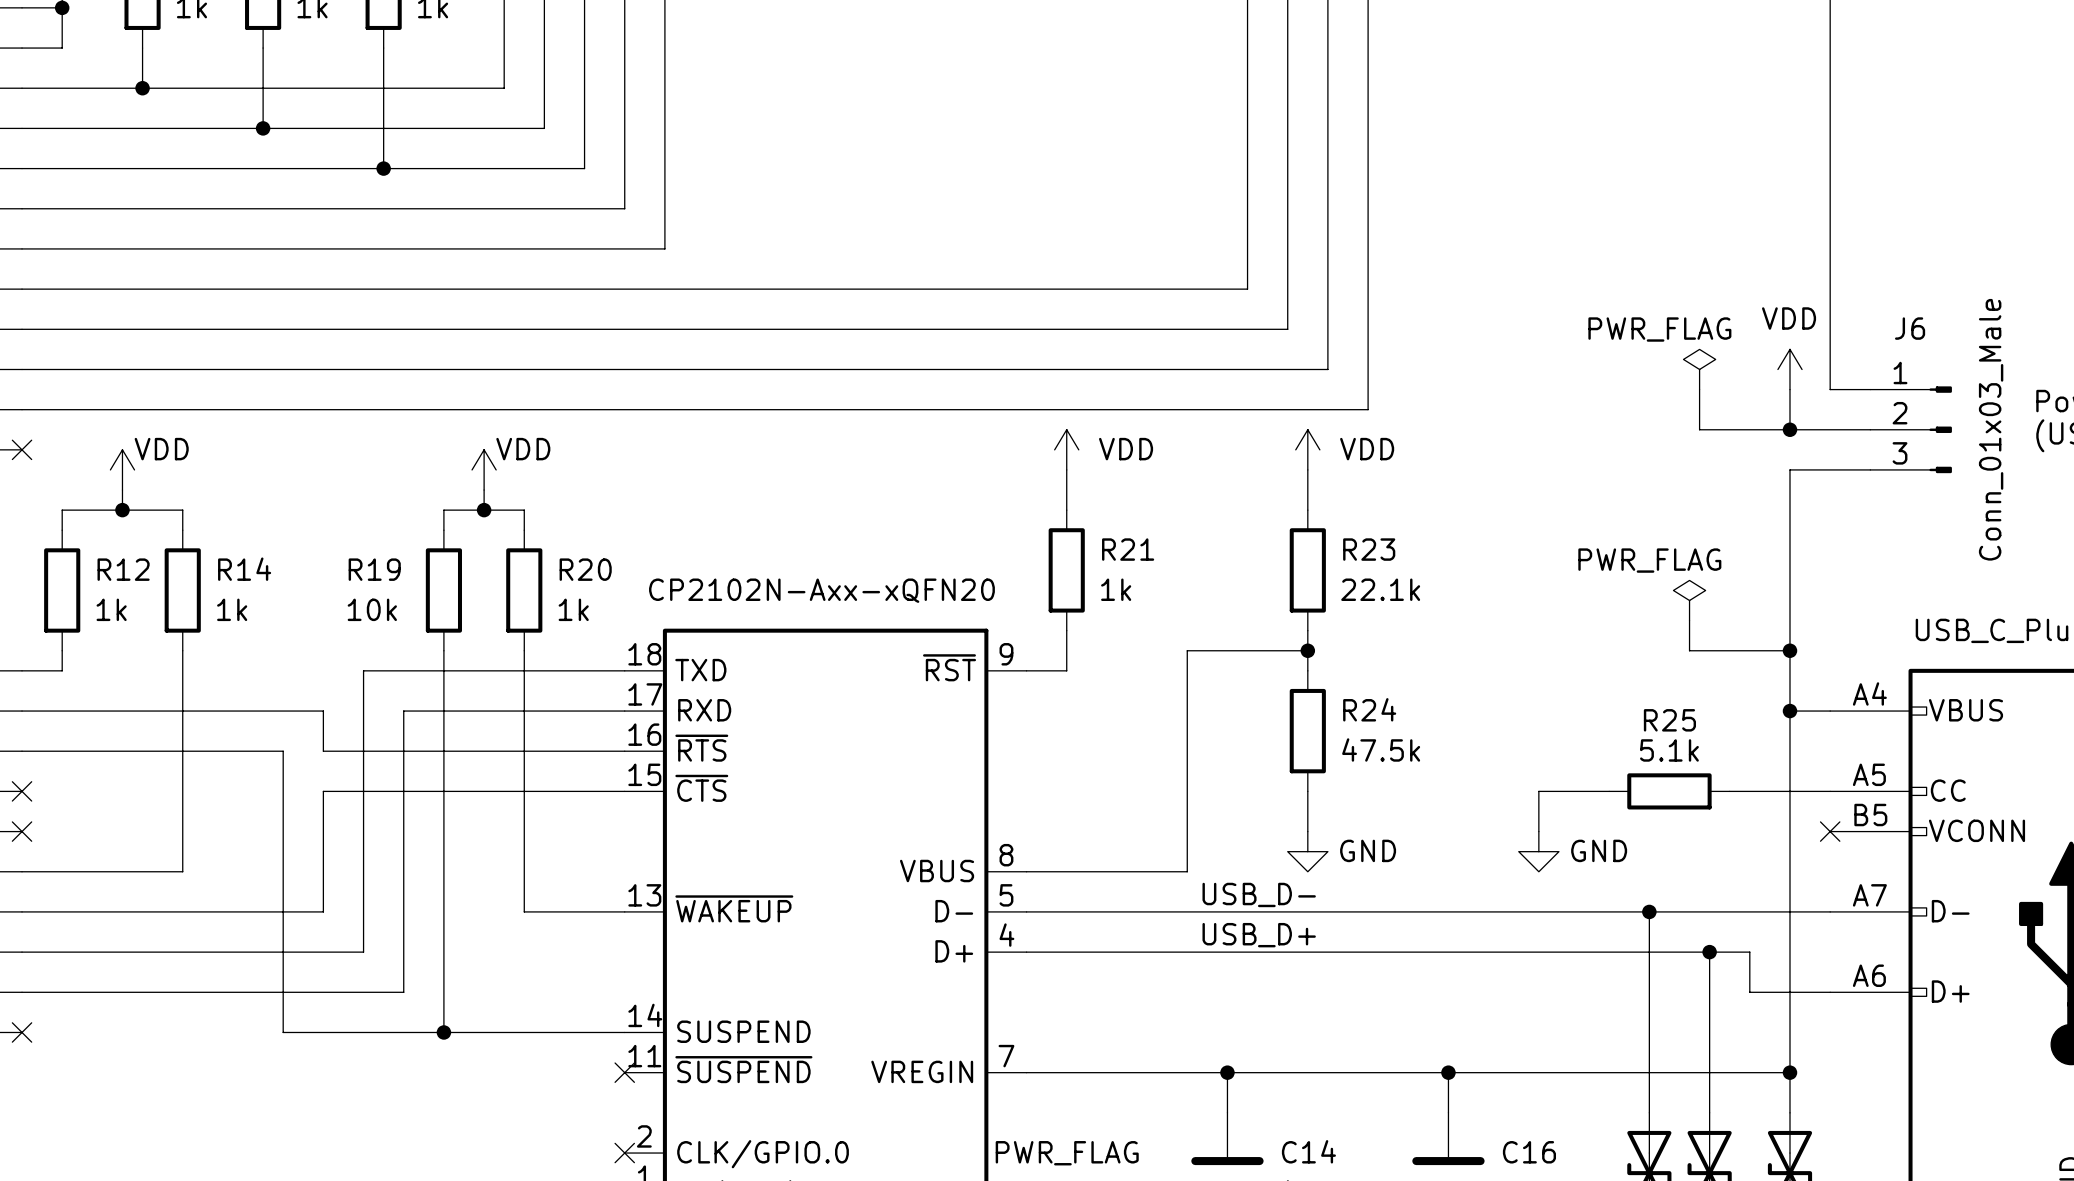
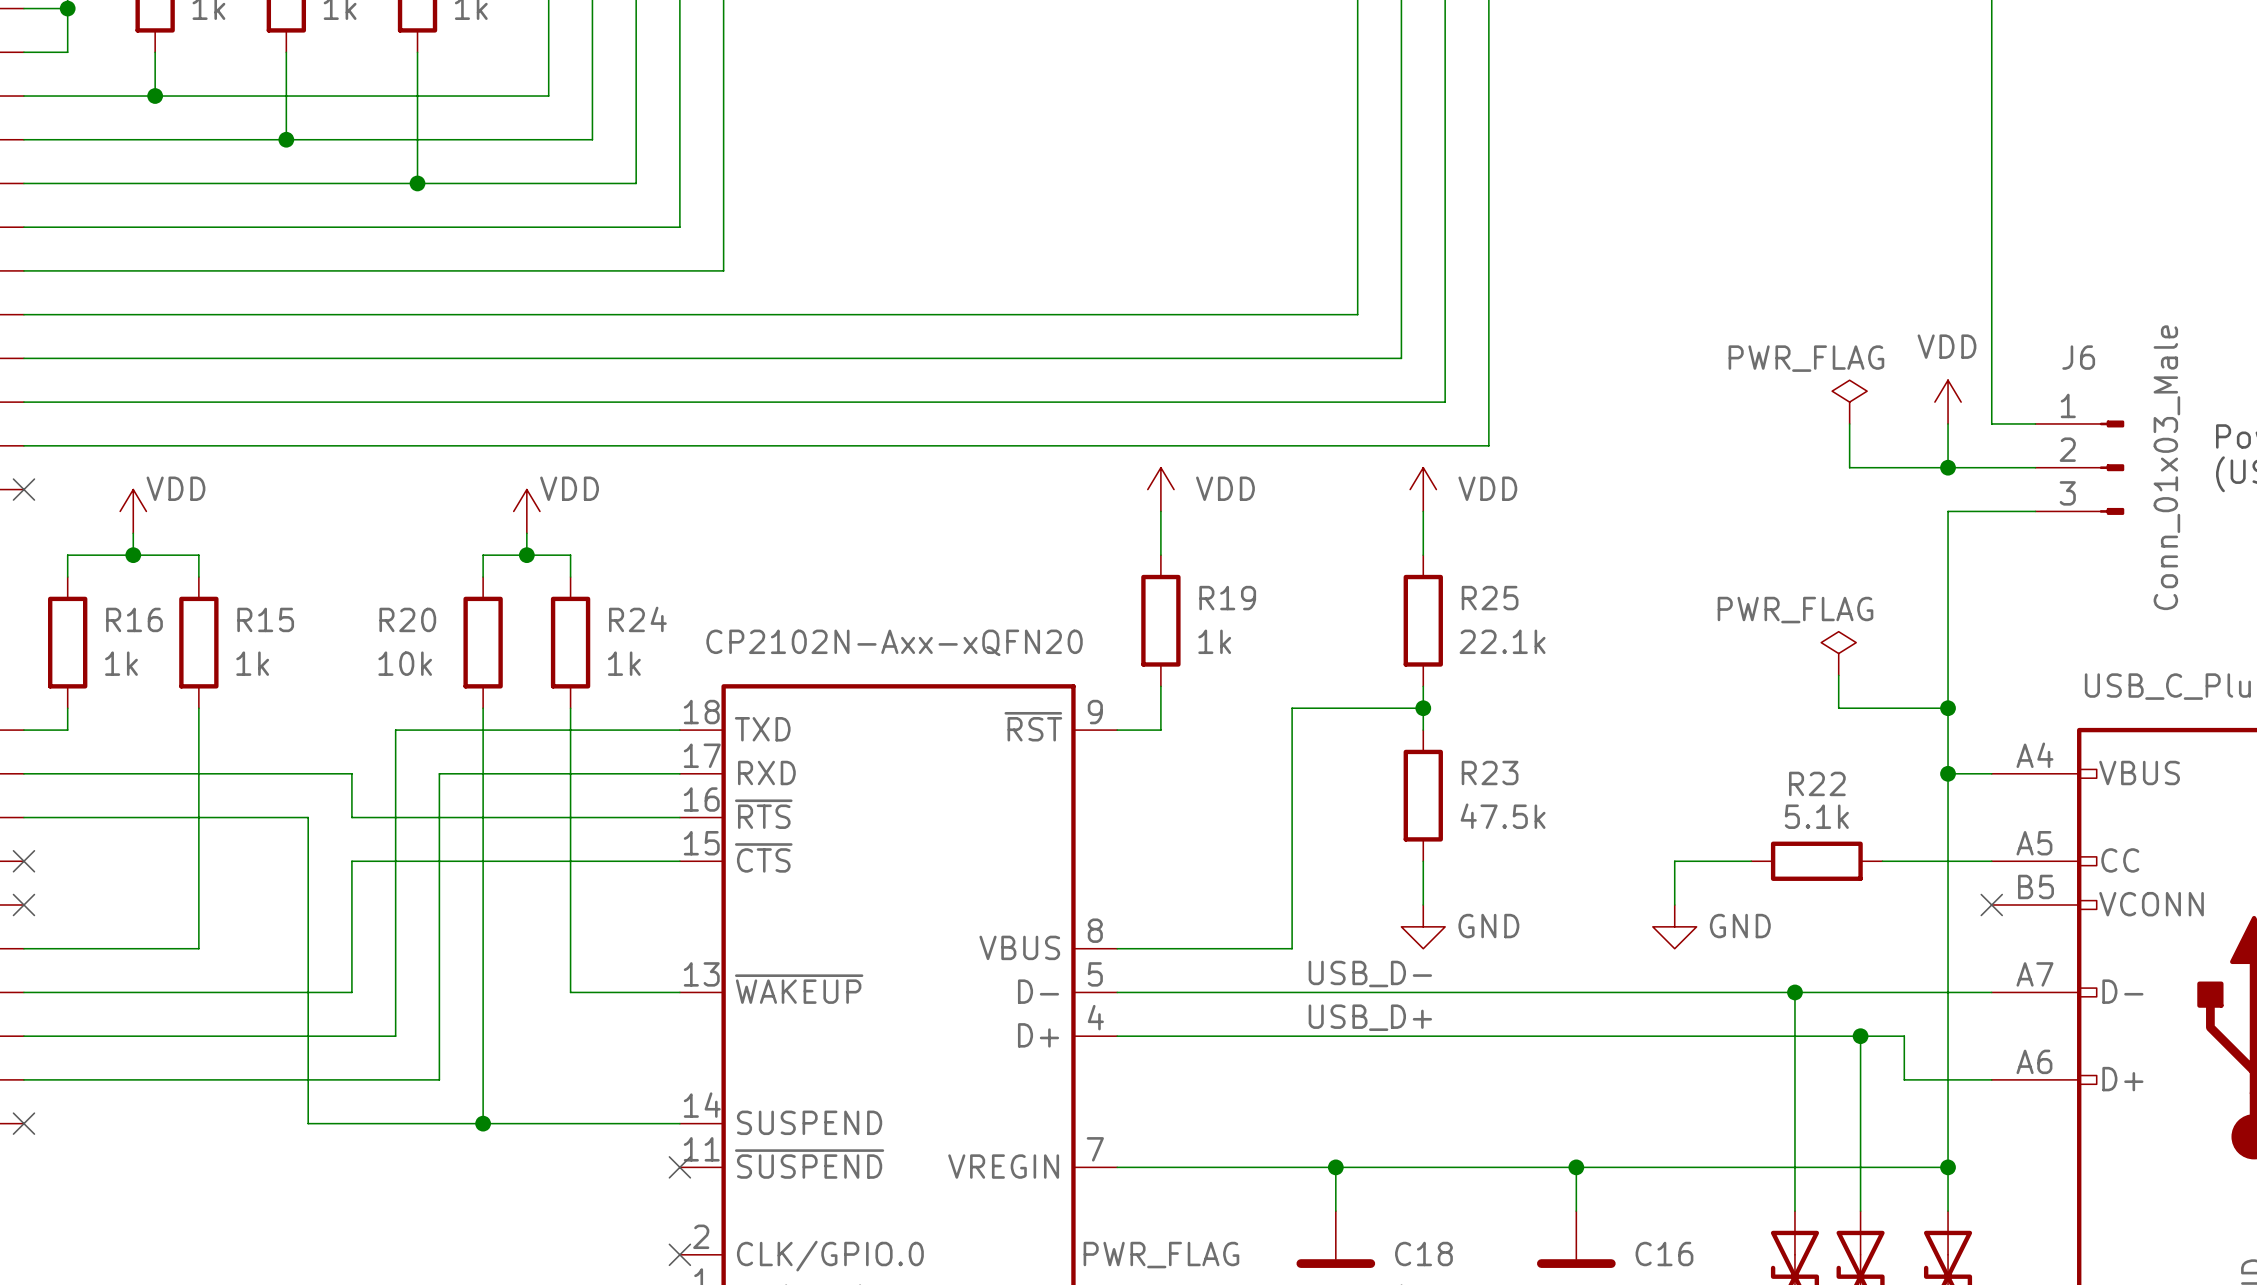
R21 name: R21 (1128, 549) -> R19 (1227, 598)
R23 name: R23 (1369, 549) -> R25 (1490, 598)
R12 name: R12 (123, 569) -> R16 (134, 619)
R14 name: R14 (244, 569) -> R15 (265, 619)
R19 name: R19 (374, 569) -> R20 (407, 619)
R20 name: R20 (585, 569) -> R24 (637, 619)
R24 name: R24 (1369, 709) -> R23 (1490, 772)
R25 name: R25 (1669, 720) -> R22 (1817, 783)
C14 name: C14 (1308, 1151) -> C18 (1423, 1254)

